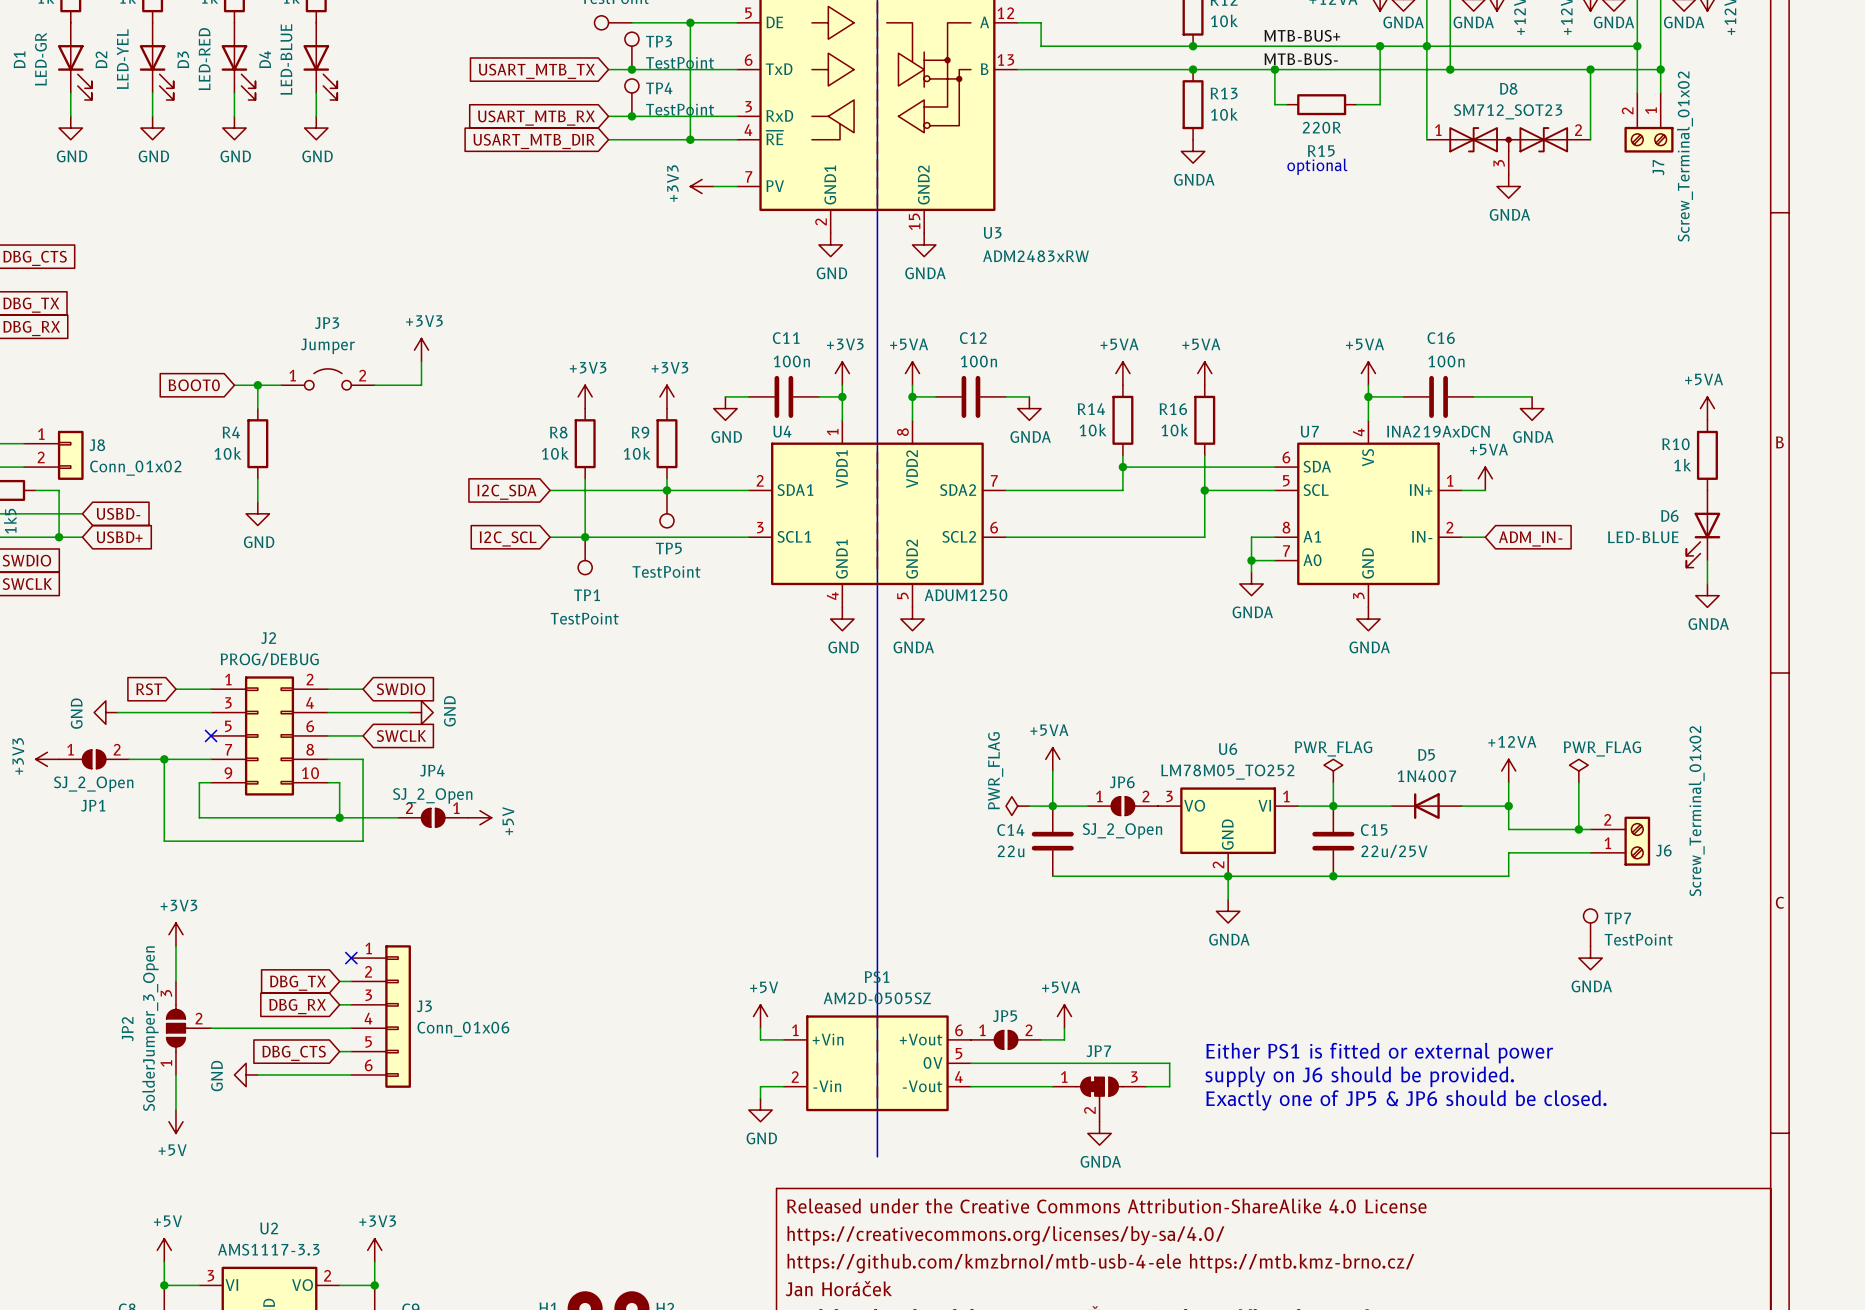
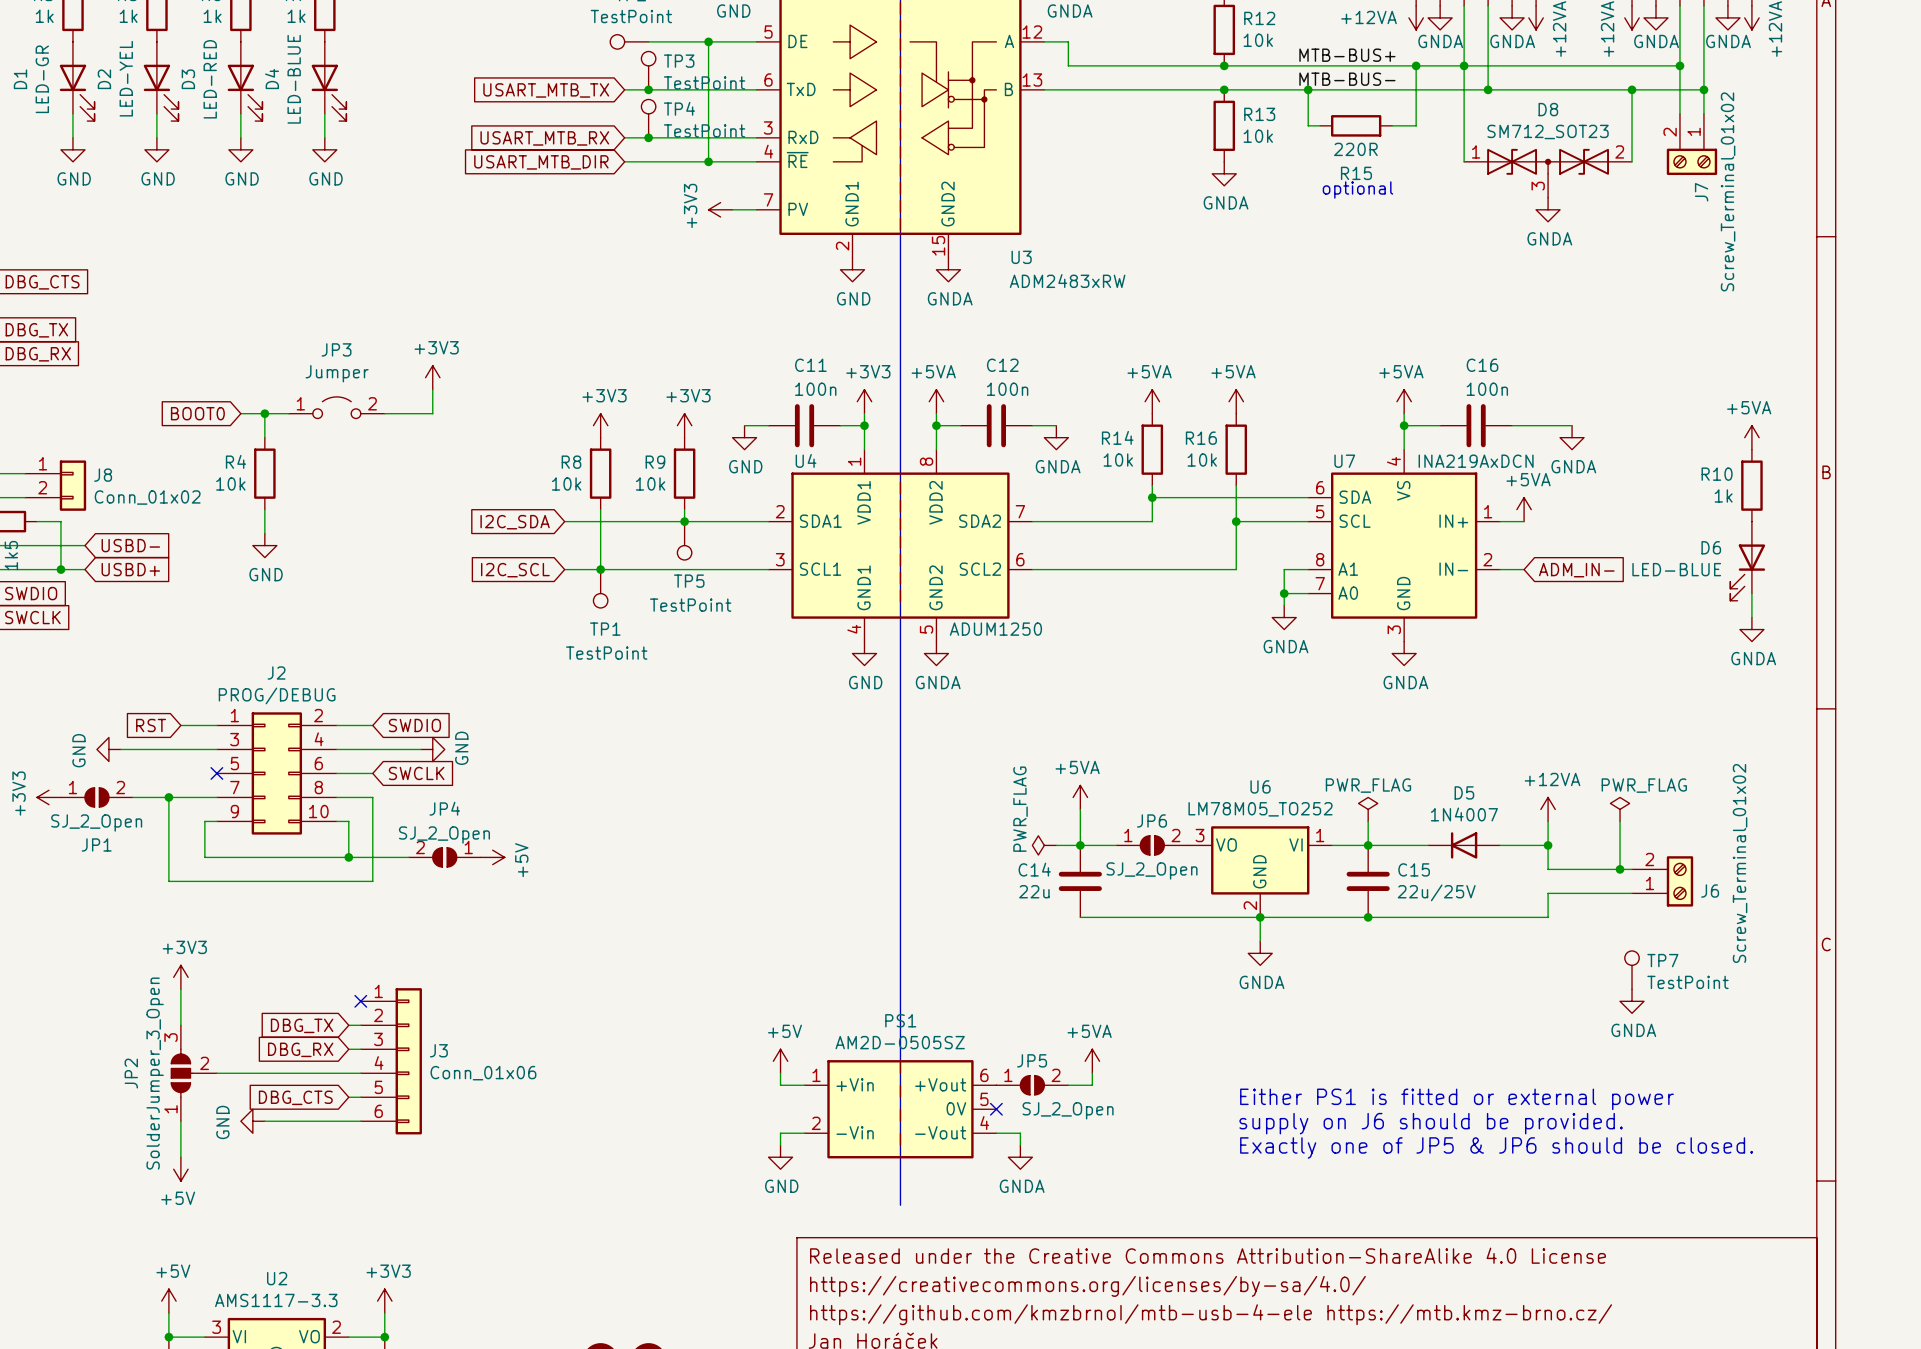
wire: (970, 1063) (1169, 1063) (1169, 1086) (1146, 1086) -> none
no-connect mark: none -> (996, 1109)
JP5 value: none -> SJ_2_Open (1068, 1110)
wire: (994, 1086) (1052, 1086) -> (1020, 1133) (1020, 1145)
JP7: (1099, 1099) -> none
power symbol position: GNDA (1099, 1133) -> GNDA (1020, 1157)

